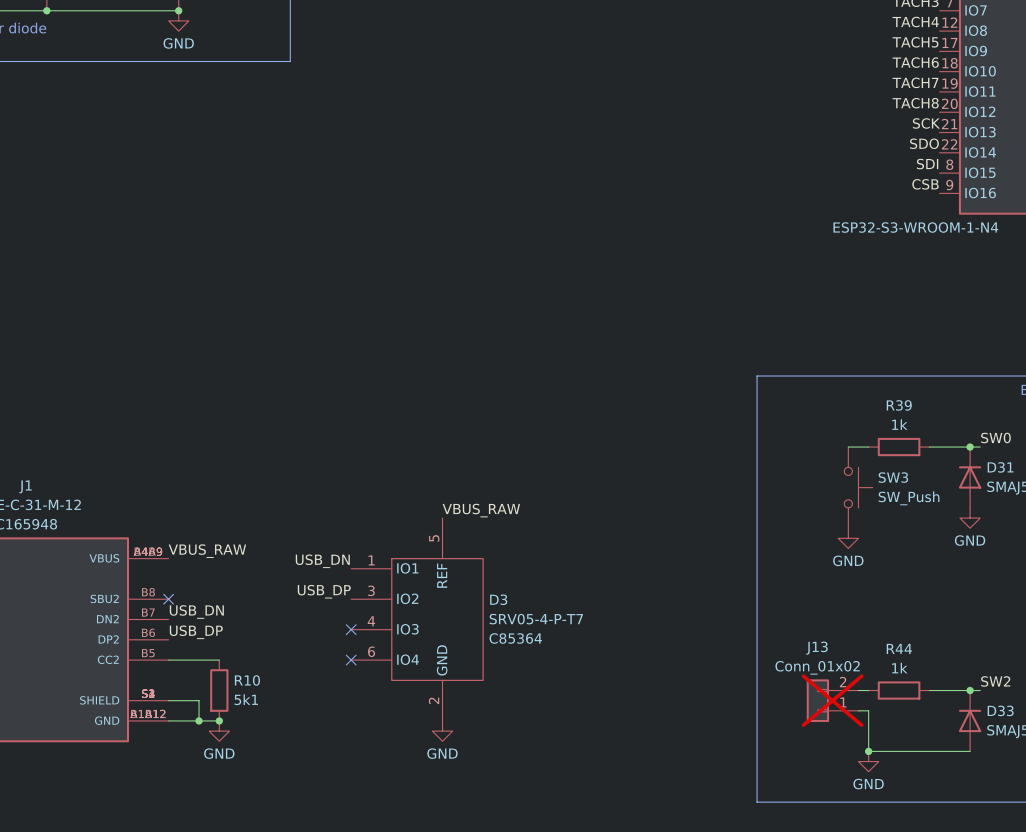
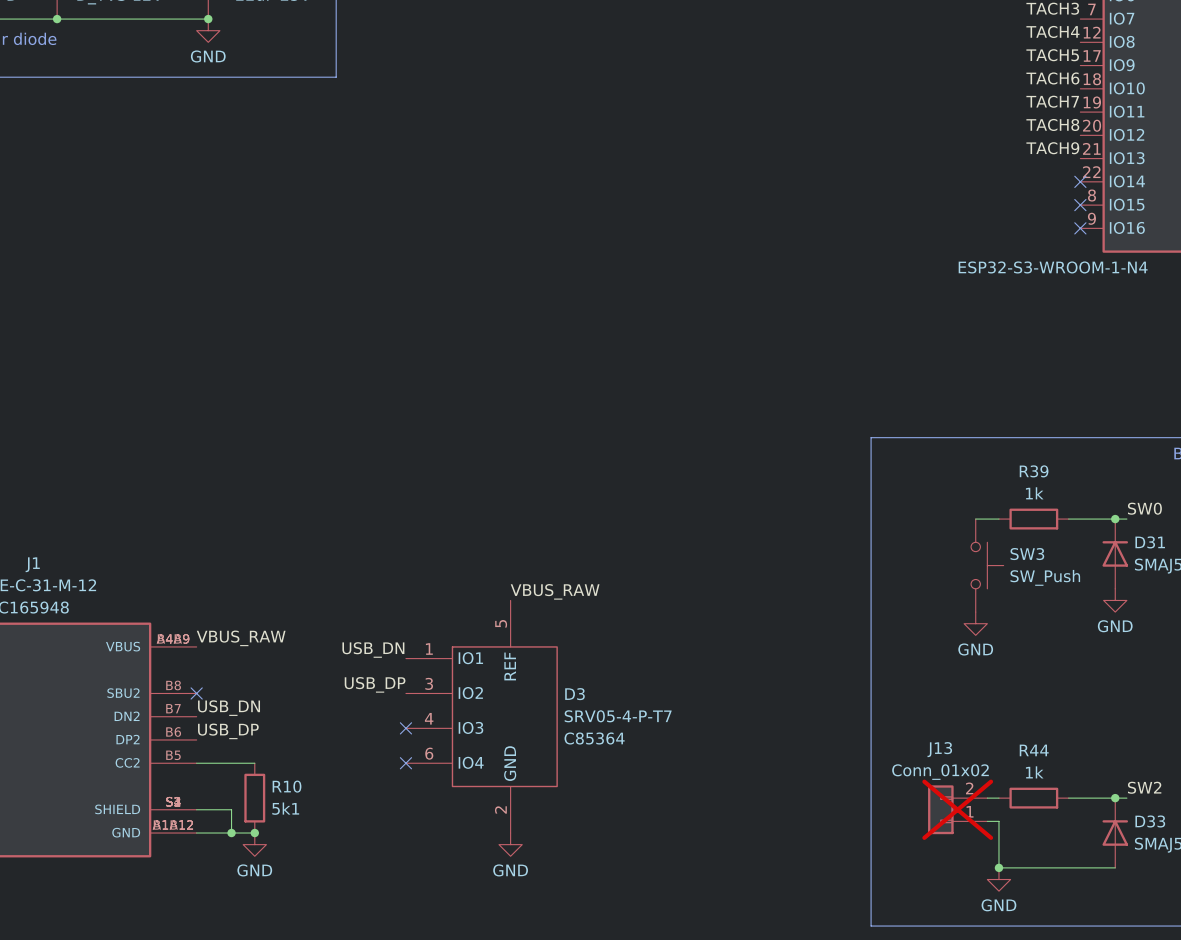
label: SCK (926, 123) -> TACH9 (1052, 148)
label: SDO (924, 143) -> none
no-connect mark: none -> (1080, 181)
label: SDI (927, 164) -> none
no-connect mark: none -> (1080, 205)
label: CSB (925, 184) -> none
no-connect mark: none -> (1080, 228)

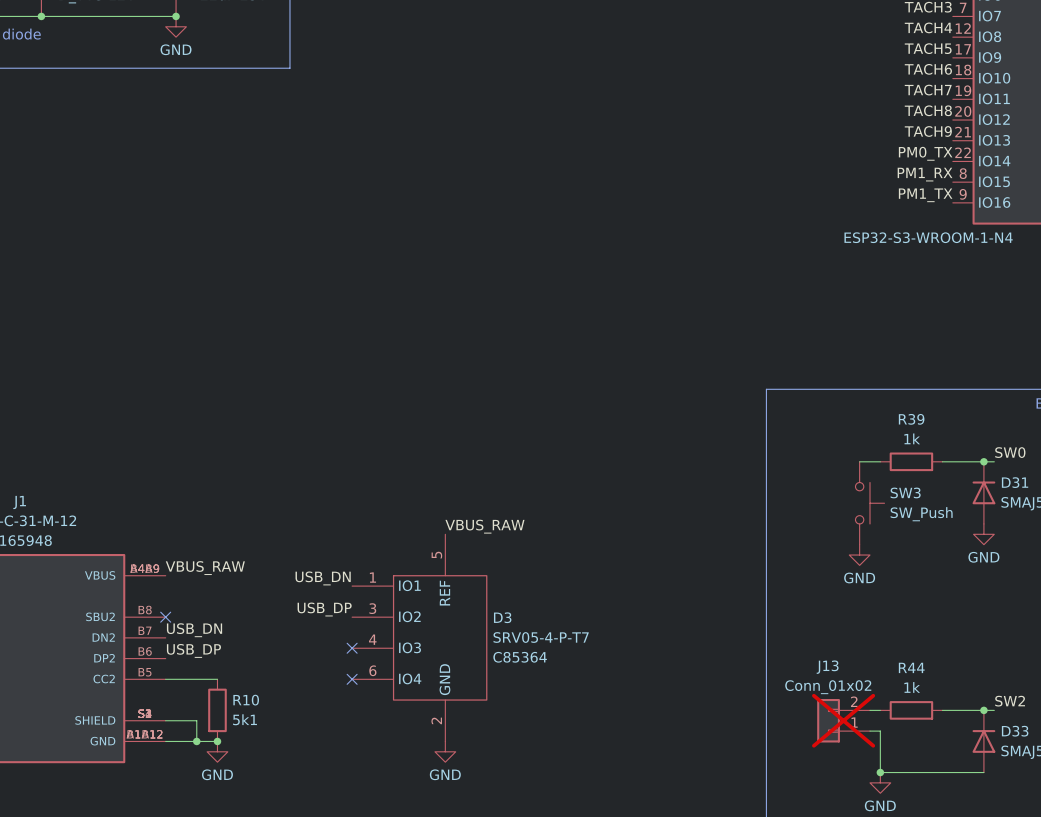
label: none -> PM0_TX (925, 153)
no-connect mark: (1080, 181) -> none
label: none -> PM1_RX (925, 174)
no-connect mark: (1080, 205) -> none
label: none -> PM1_TX (925, 195)
no-connect mark: (1080, 228) -> none

